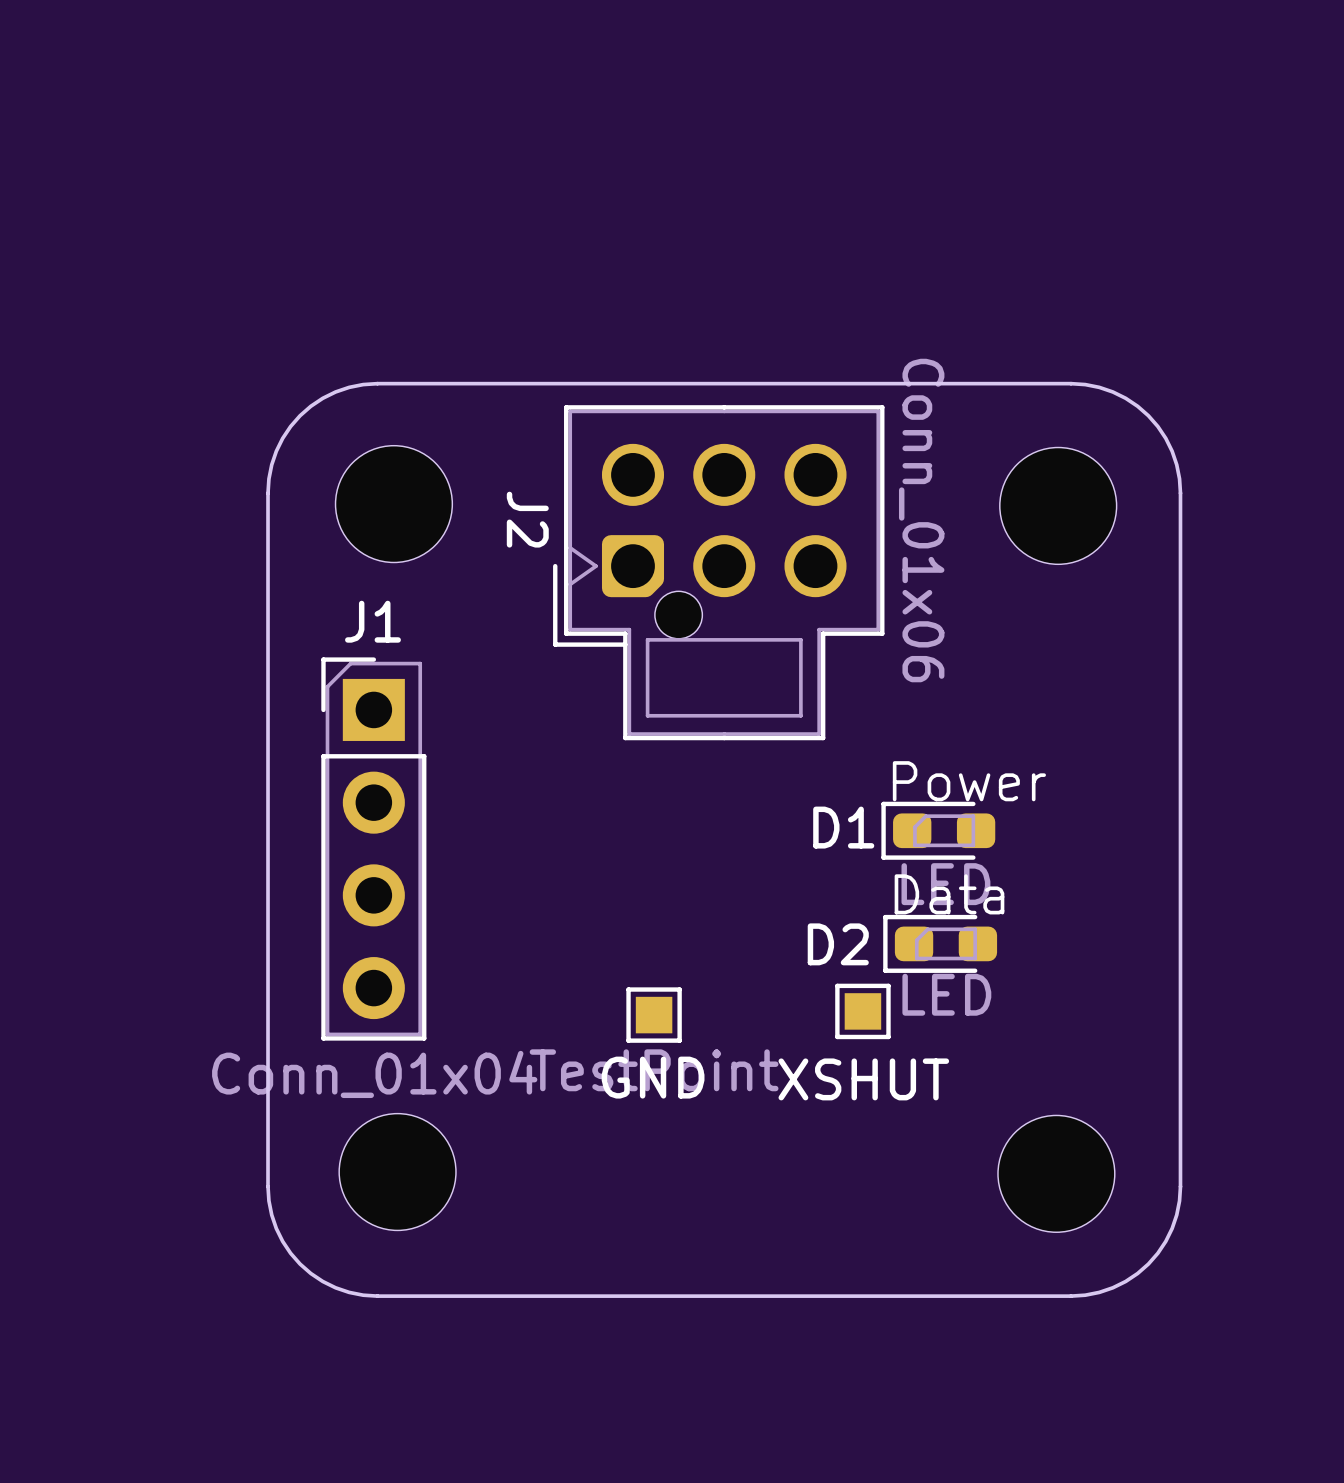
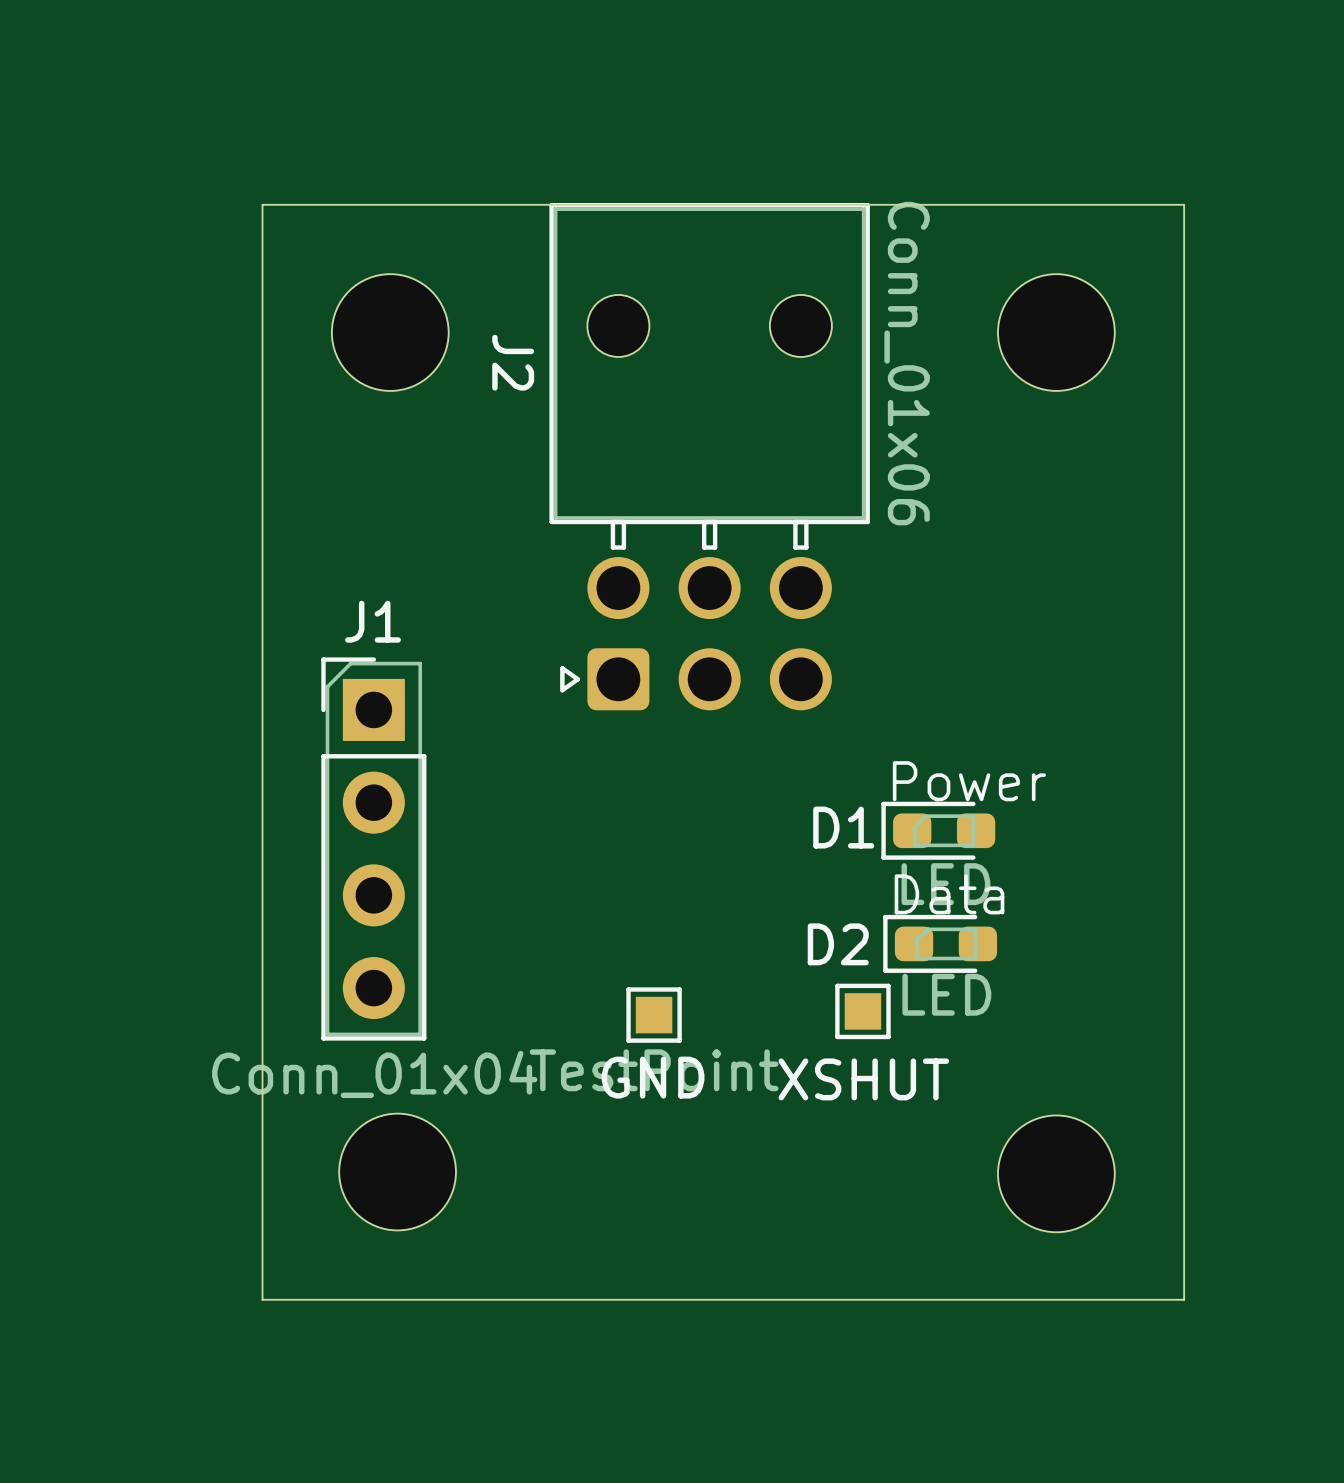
board edge: (1070, 383) (377, 383) (349, 387) (322, 398) (310, 406) (290, 426) (282, 438) (271, 464) (268, 493) (268, 1186) (271, 1214) (276, 1228) (290, 1253) (310, 1273) (322, 1281) (349, 1292) (377, 1296) (1070, 1296) (1099, 1292) (1125, 1281) (1148, 1264) (1157, 1253) (1172, 1228) (1176, 1214) (1180, 1186) (1179, 478) (1172, 451) (1165, 438) (1157, 426) (1137, 406) (1125, 398) (1099, 387) (1070, 383) -> (1184, 204) (1184, 1299) (262, 1299) (262, 204) (1184, 204)
J2 footprint: [553, 405, 885, 741] -> [549, 202, 870, 711]
part position: (393, 504) -> (390, 332)
part position: (1058, 505) -> (1056, 332)

